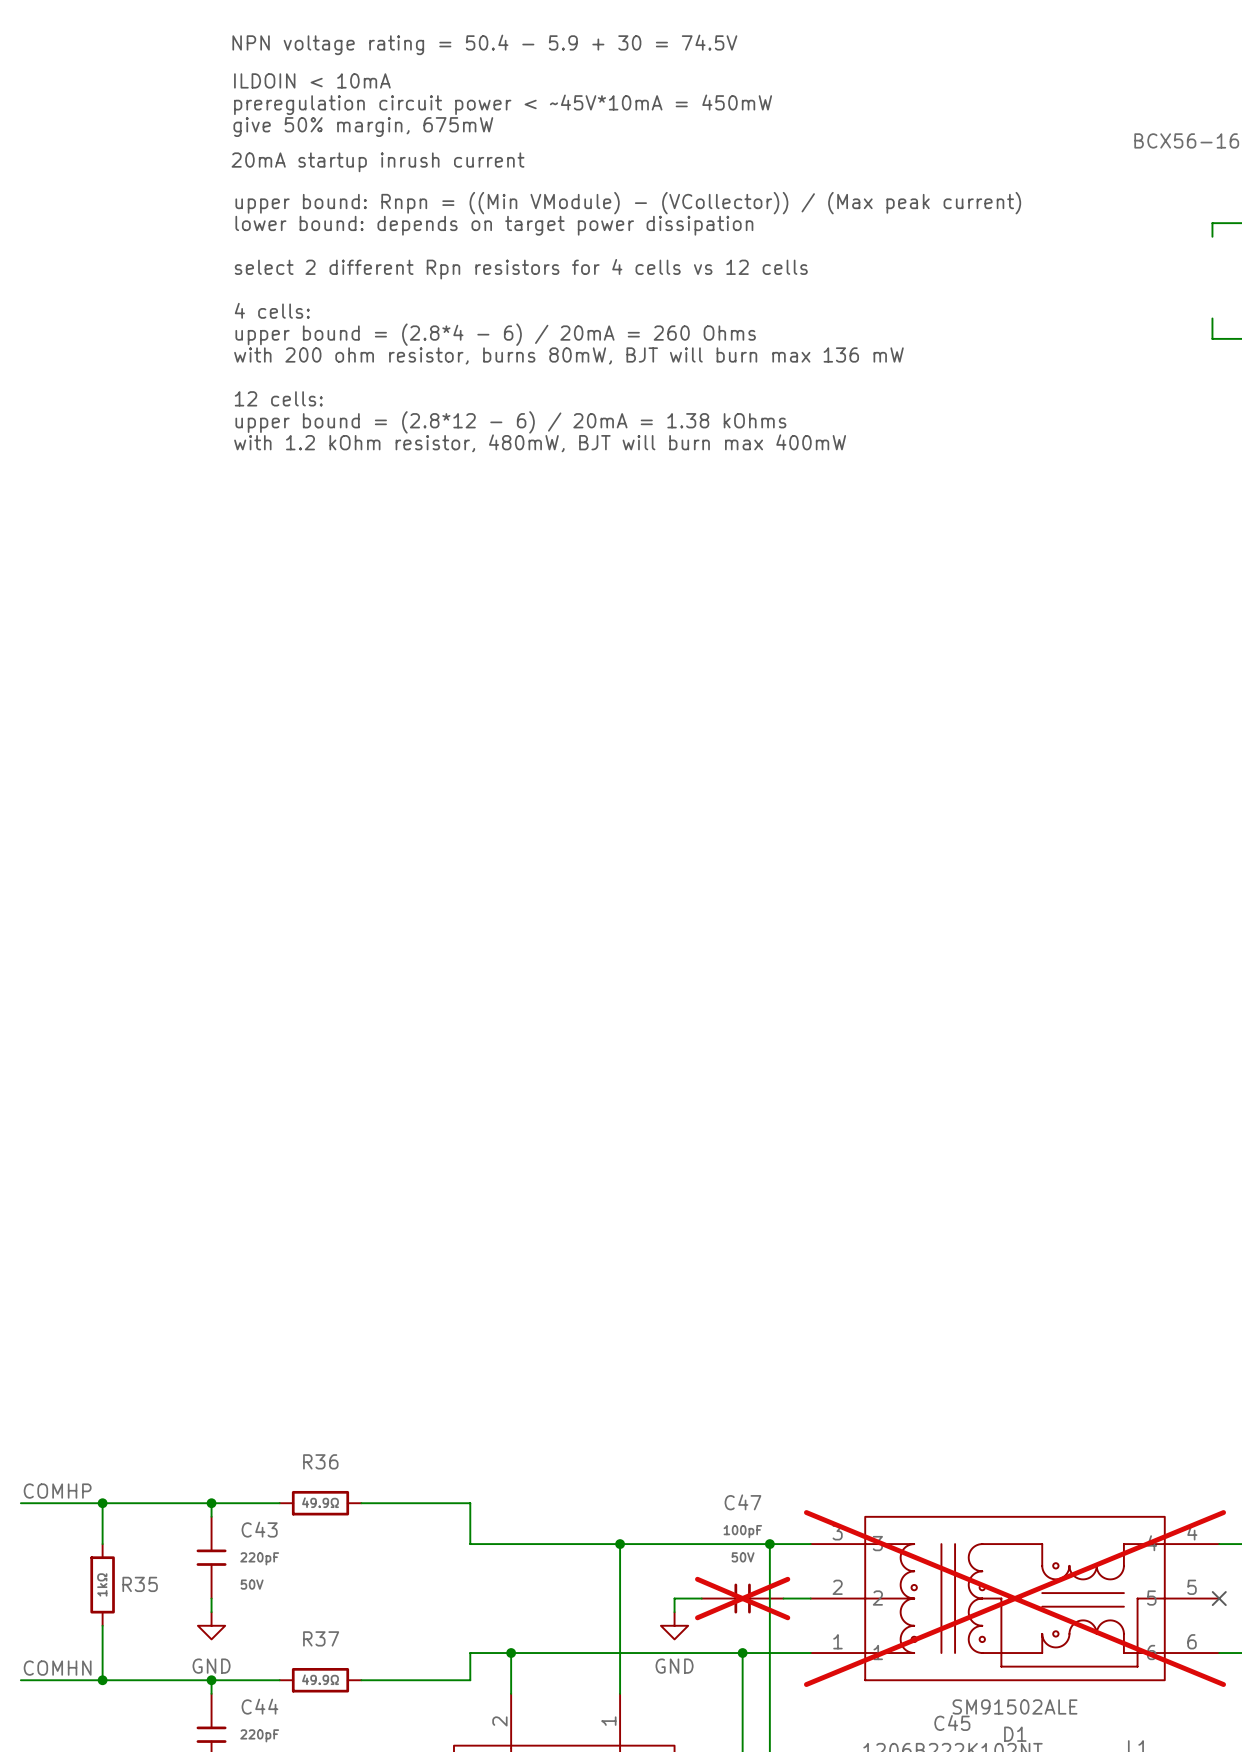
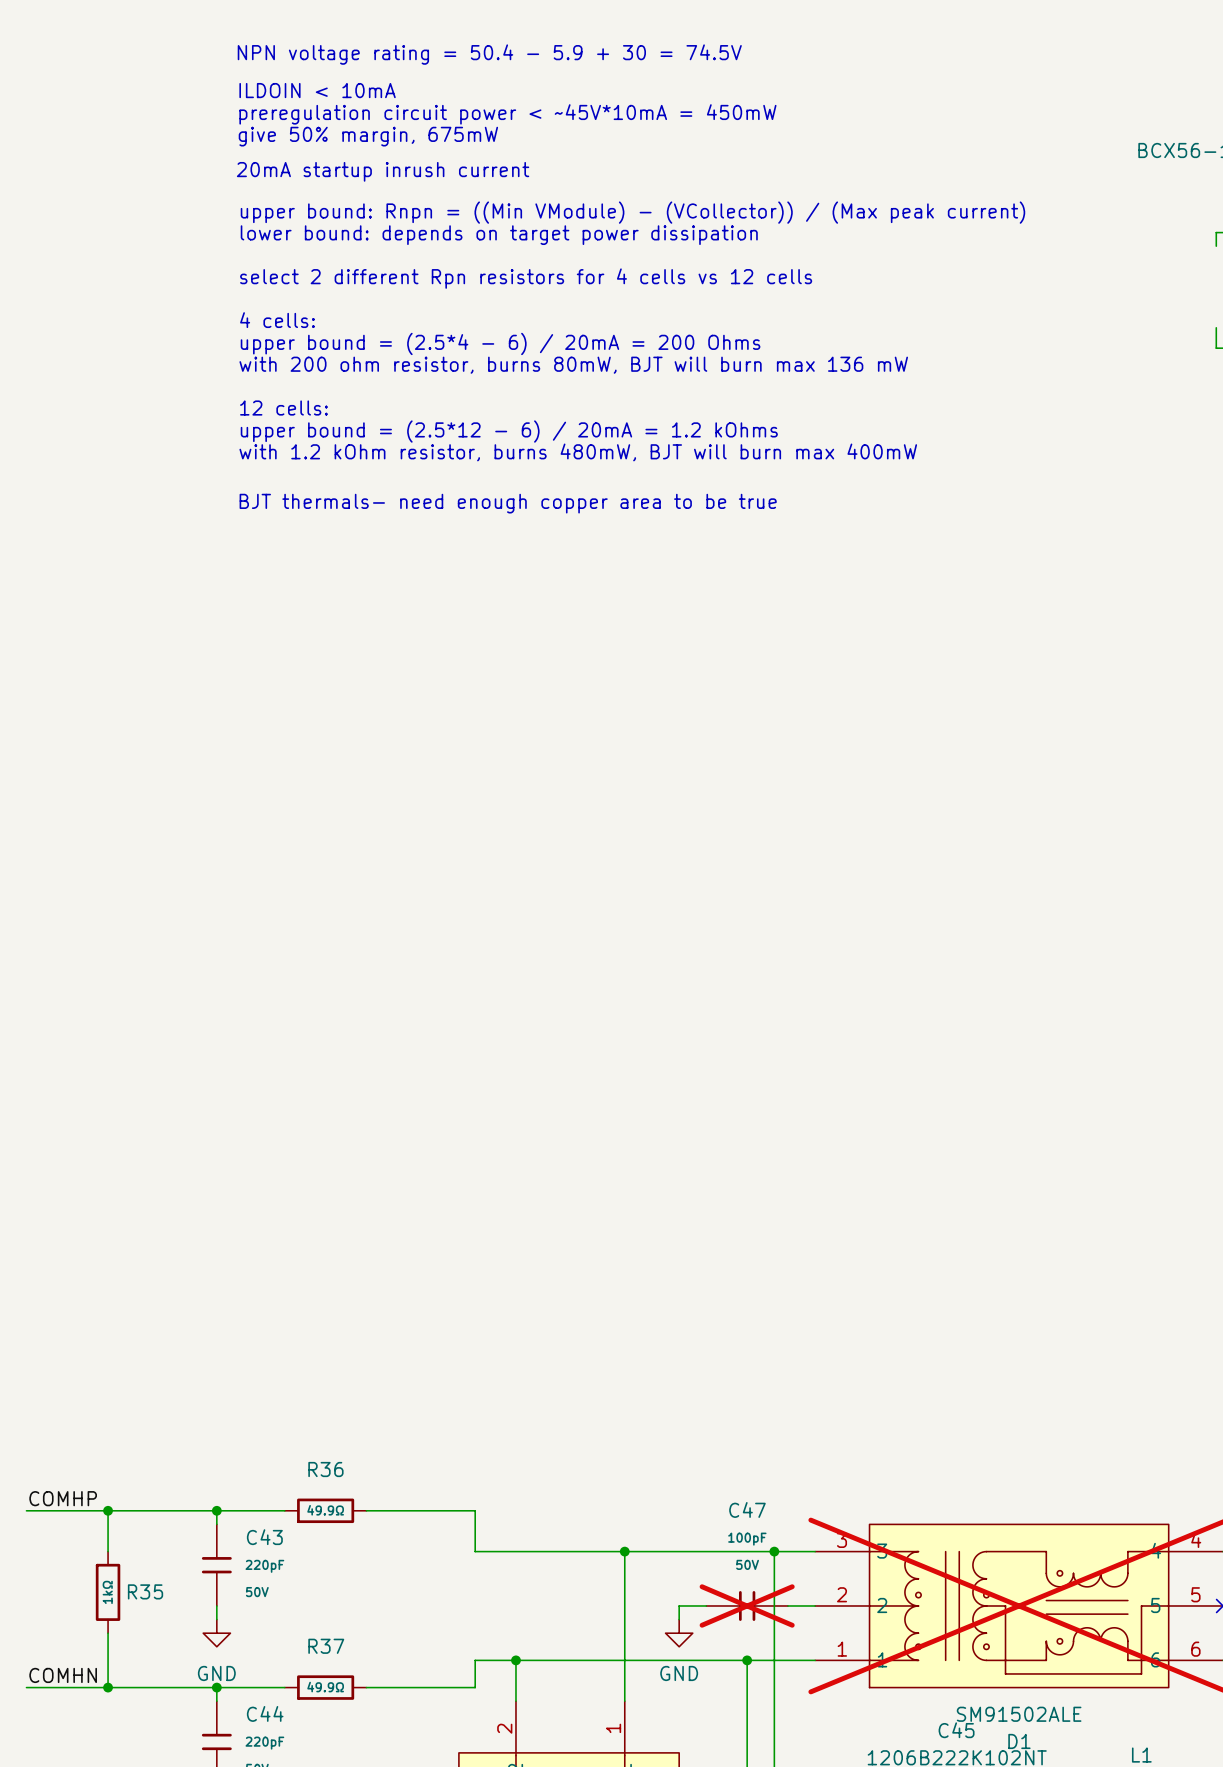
text: upper bound = (2.8*4 - 6) / 20mA = 260 Ohms (495, 334) -> upper bound = (2.5*4 - 6) / 20mA = 200 Ohms (500, 343)
text: upper bound = (2.8*12 - 6) / 20mA = 1.38 kOhms (510, 422) -> upper bound = (2.5*12 - 6) / 20mA = 1.2 kOhms (509, 431)
text: with 1.2 kOhm resistor, 480mW, BJT will burn max 400mW (540, 443) -> with 1.2 kOhm resistor, burns 480mW, BJT will burn max 400mW (578, 452)
text: none -> BJT thermals- need enough copper area to be true (508, 503)

